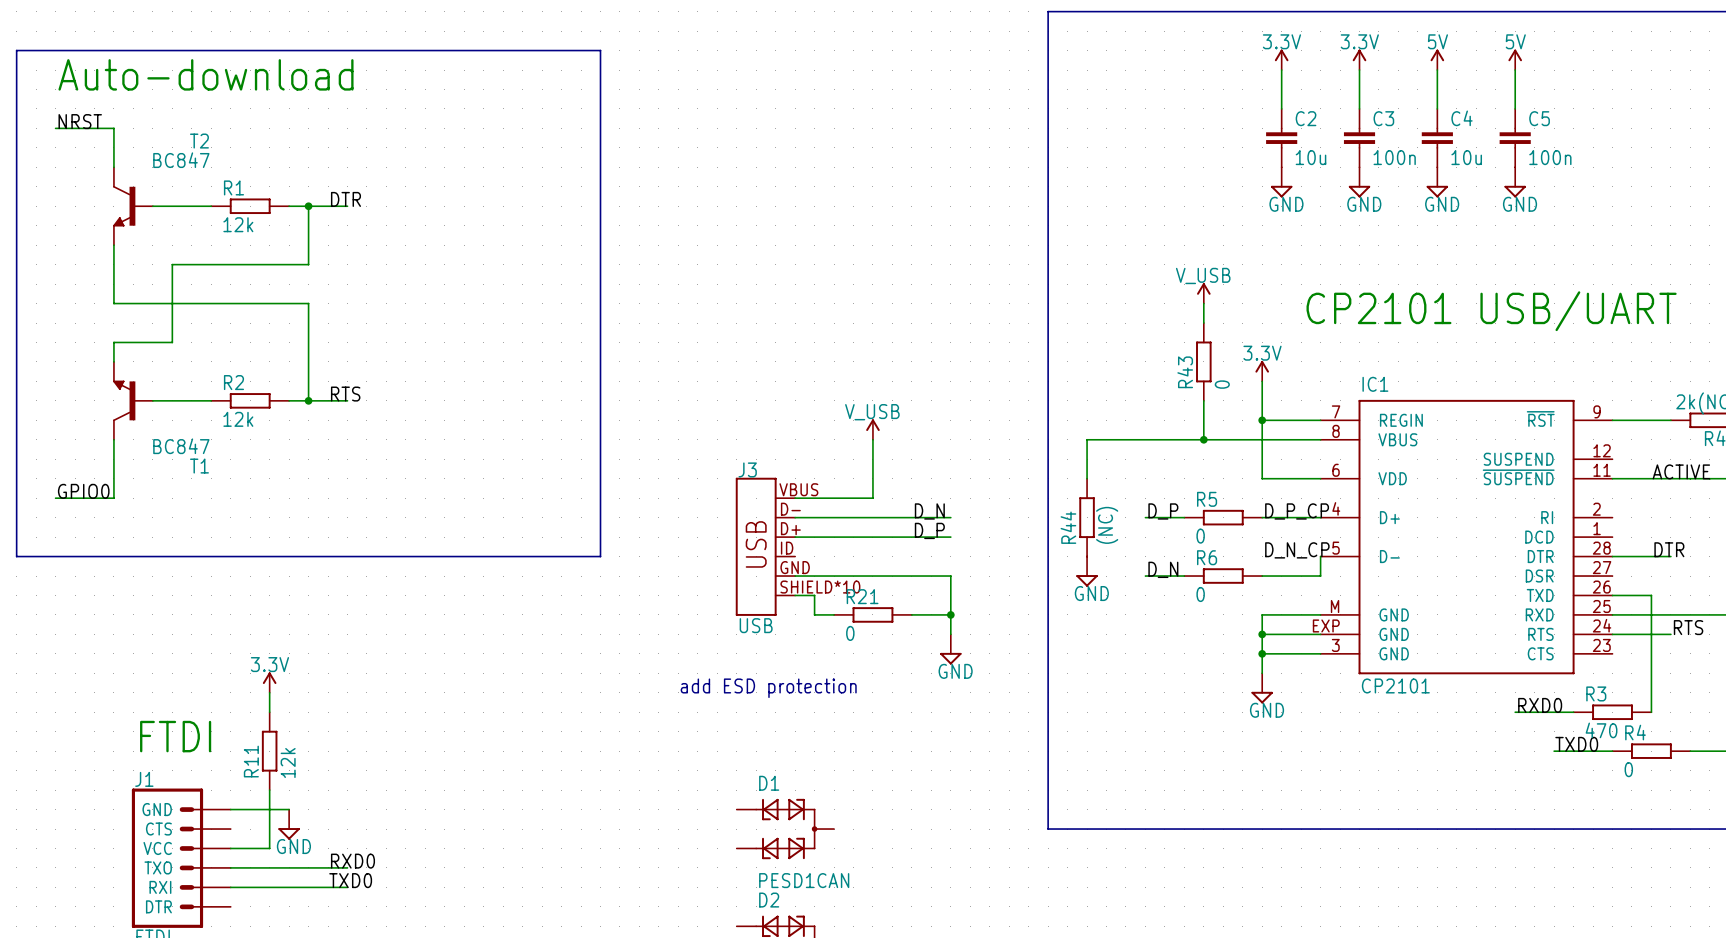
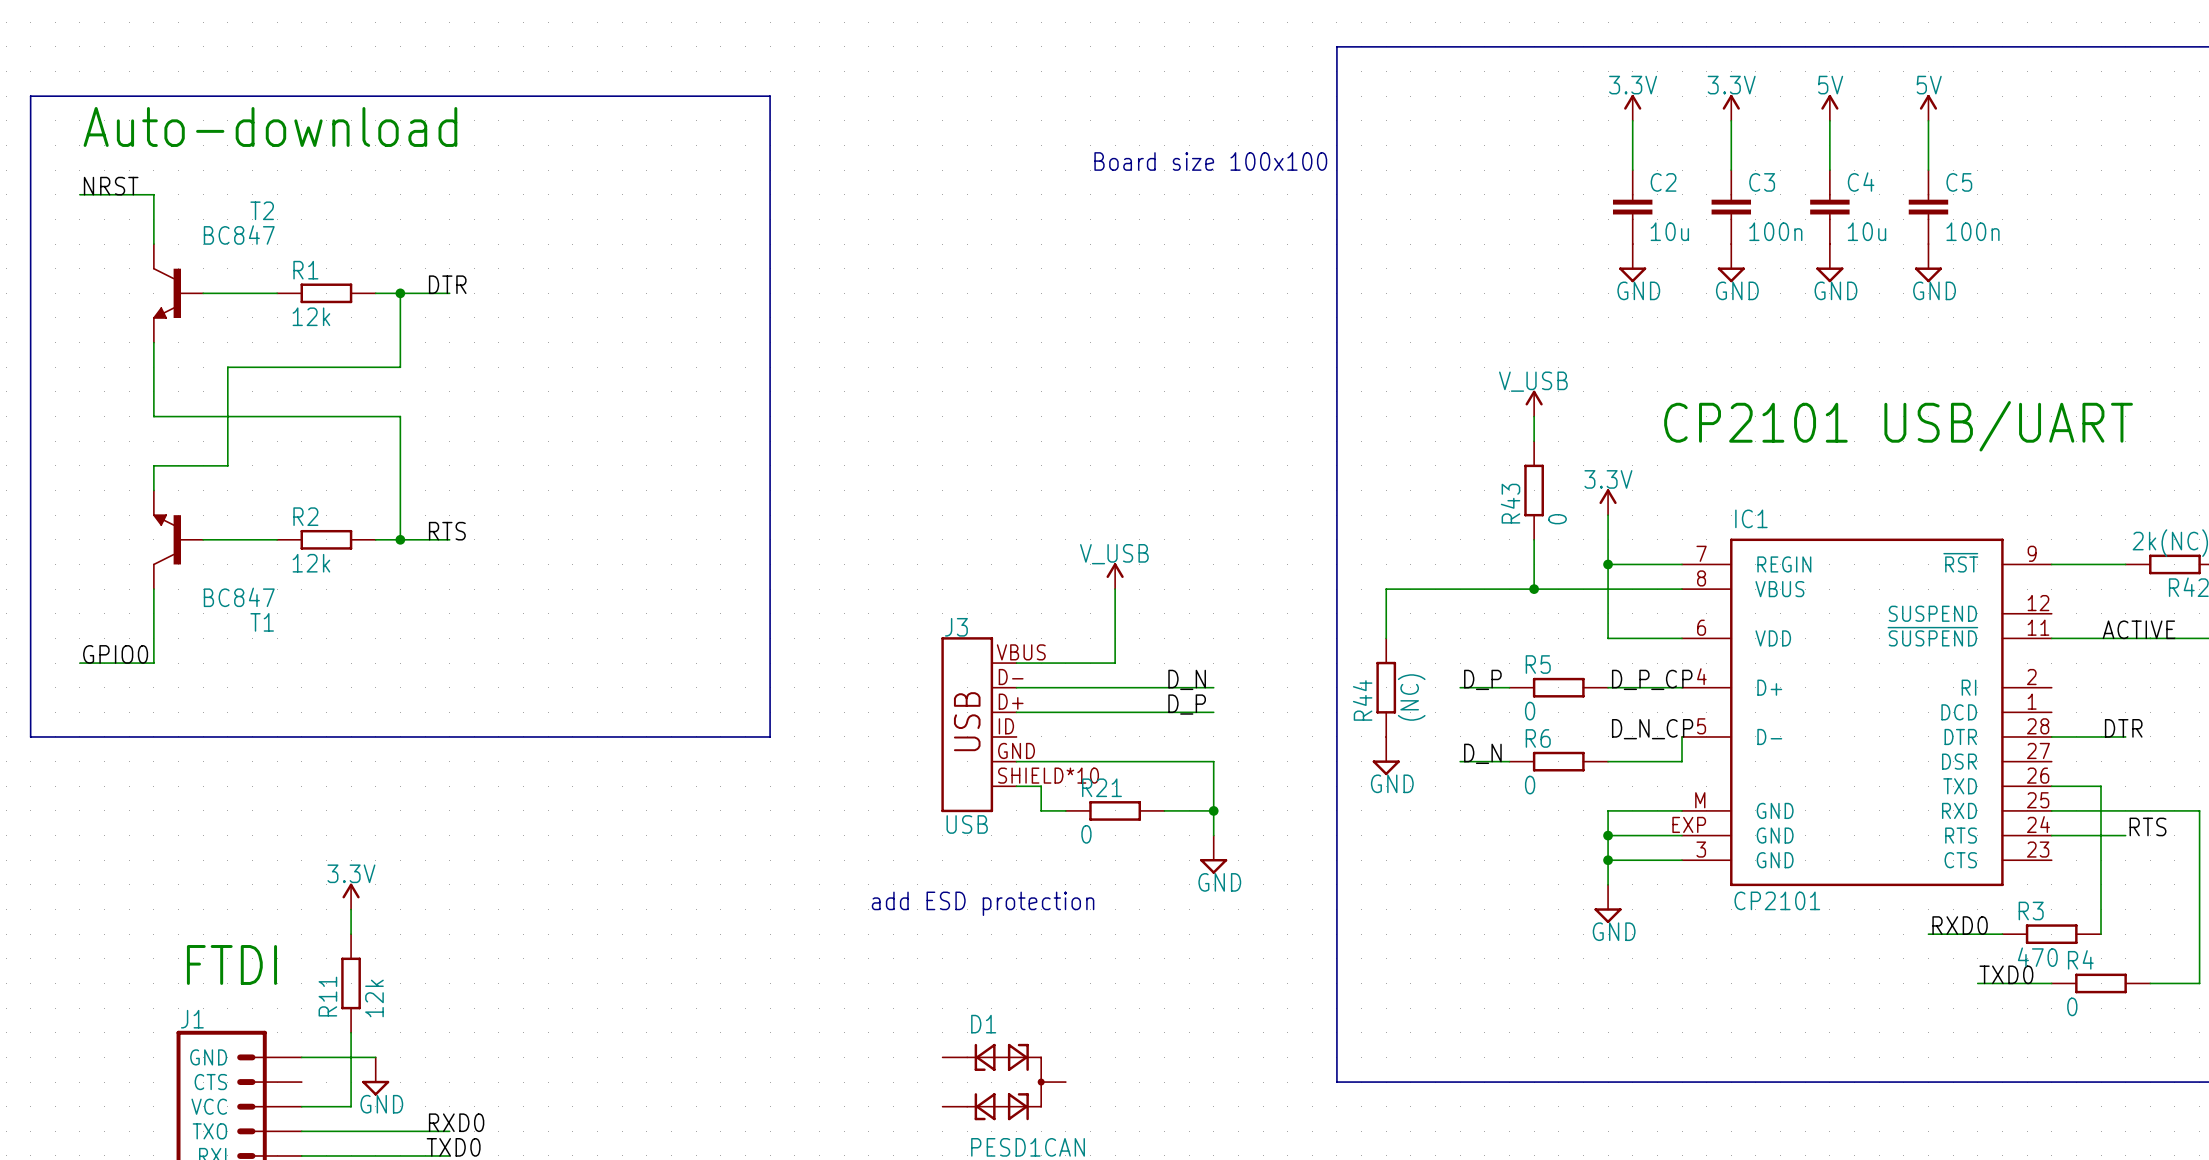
text: none -> Board size 100x100 (1210, 161)

